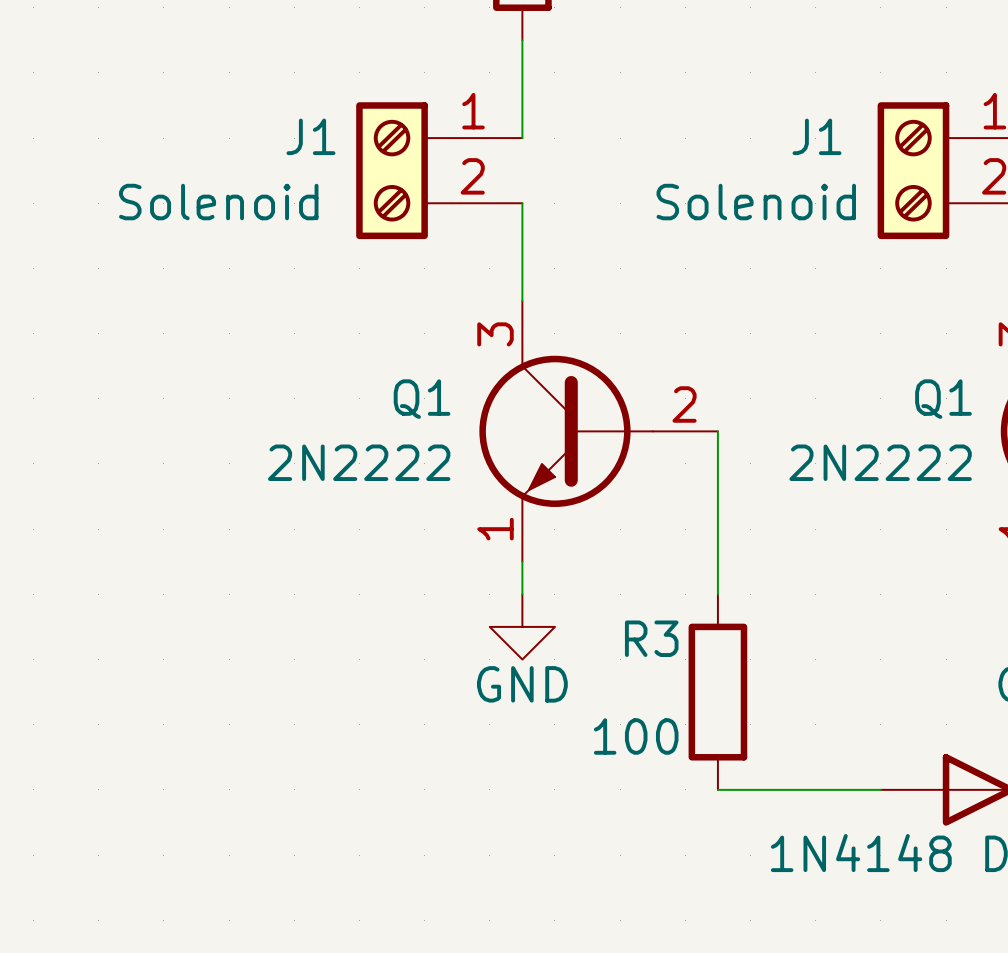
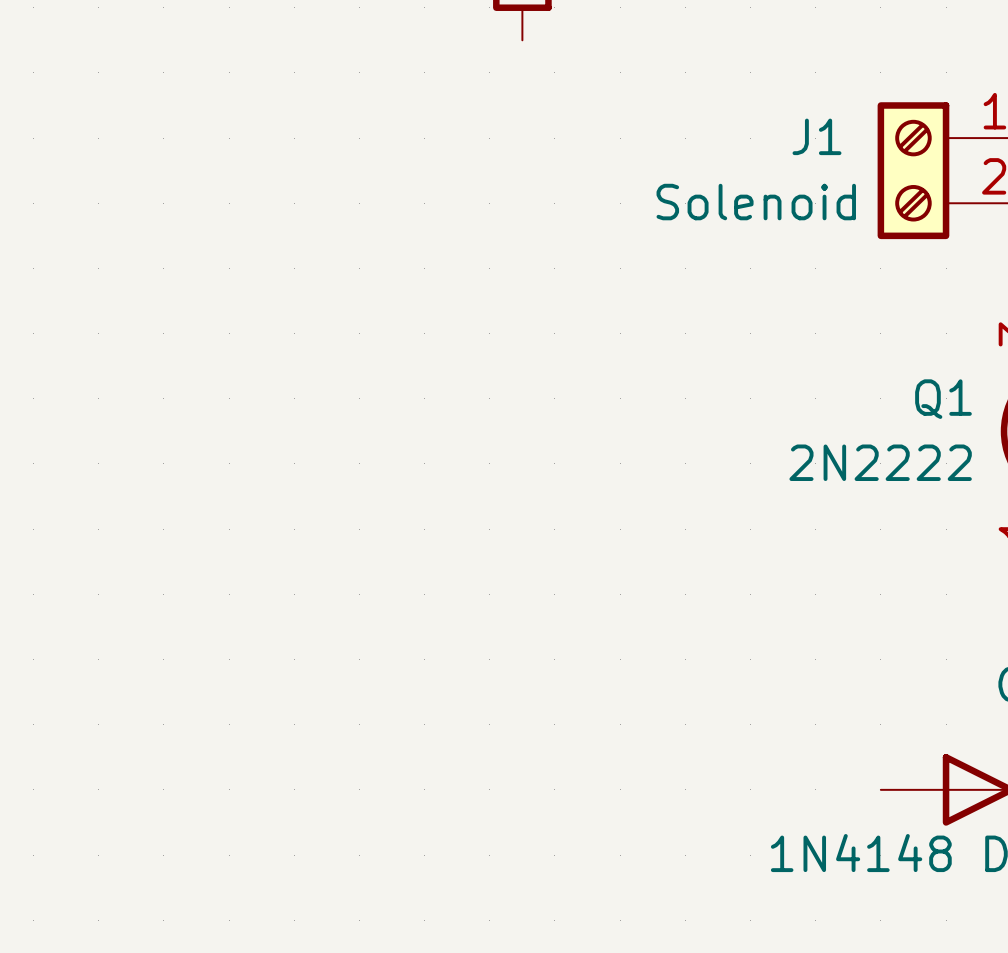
wire: (522, 40) (522, 138) -> none
J1: Solenoid (439, 170) -> none
wire: (522, 203) (522, 301) -> none
Q1: 2N2222 (598, 431) -> none
wire: (717, 431) (717, 594) -> none
wire: (522, 561) (522, 594) -> none
power symbol: GND (522, 626) -> none
R3: 100 (717, 692) -> none
wire: (717, 789) (880, 789) -> none

